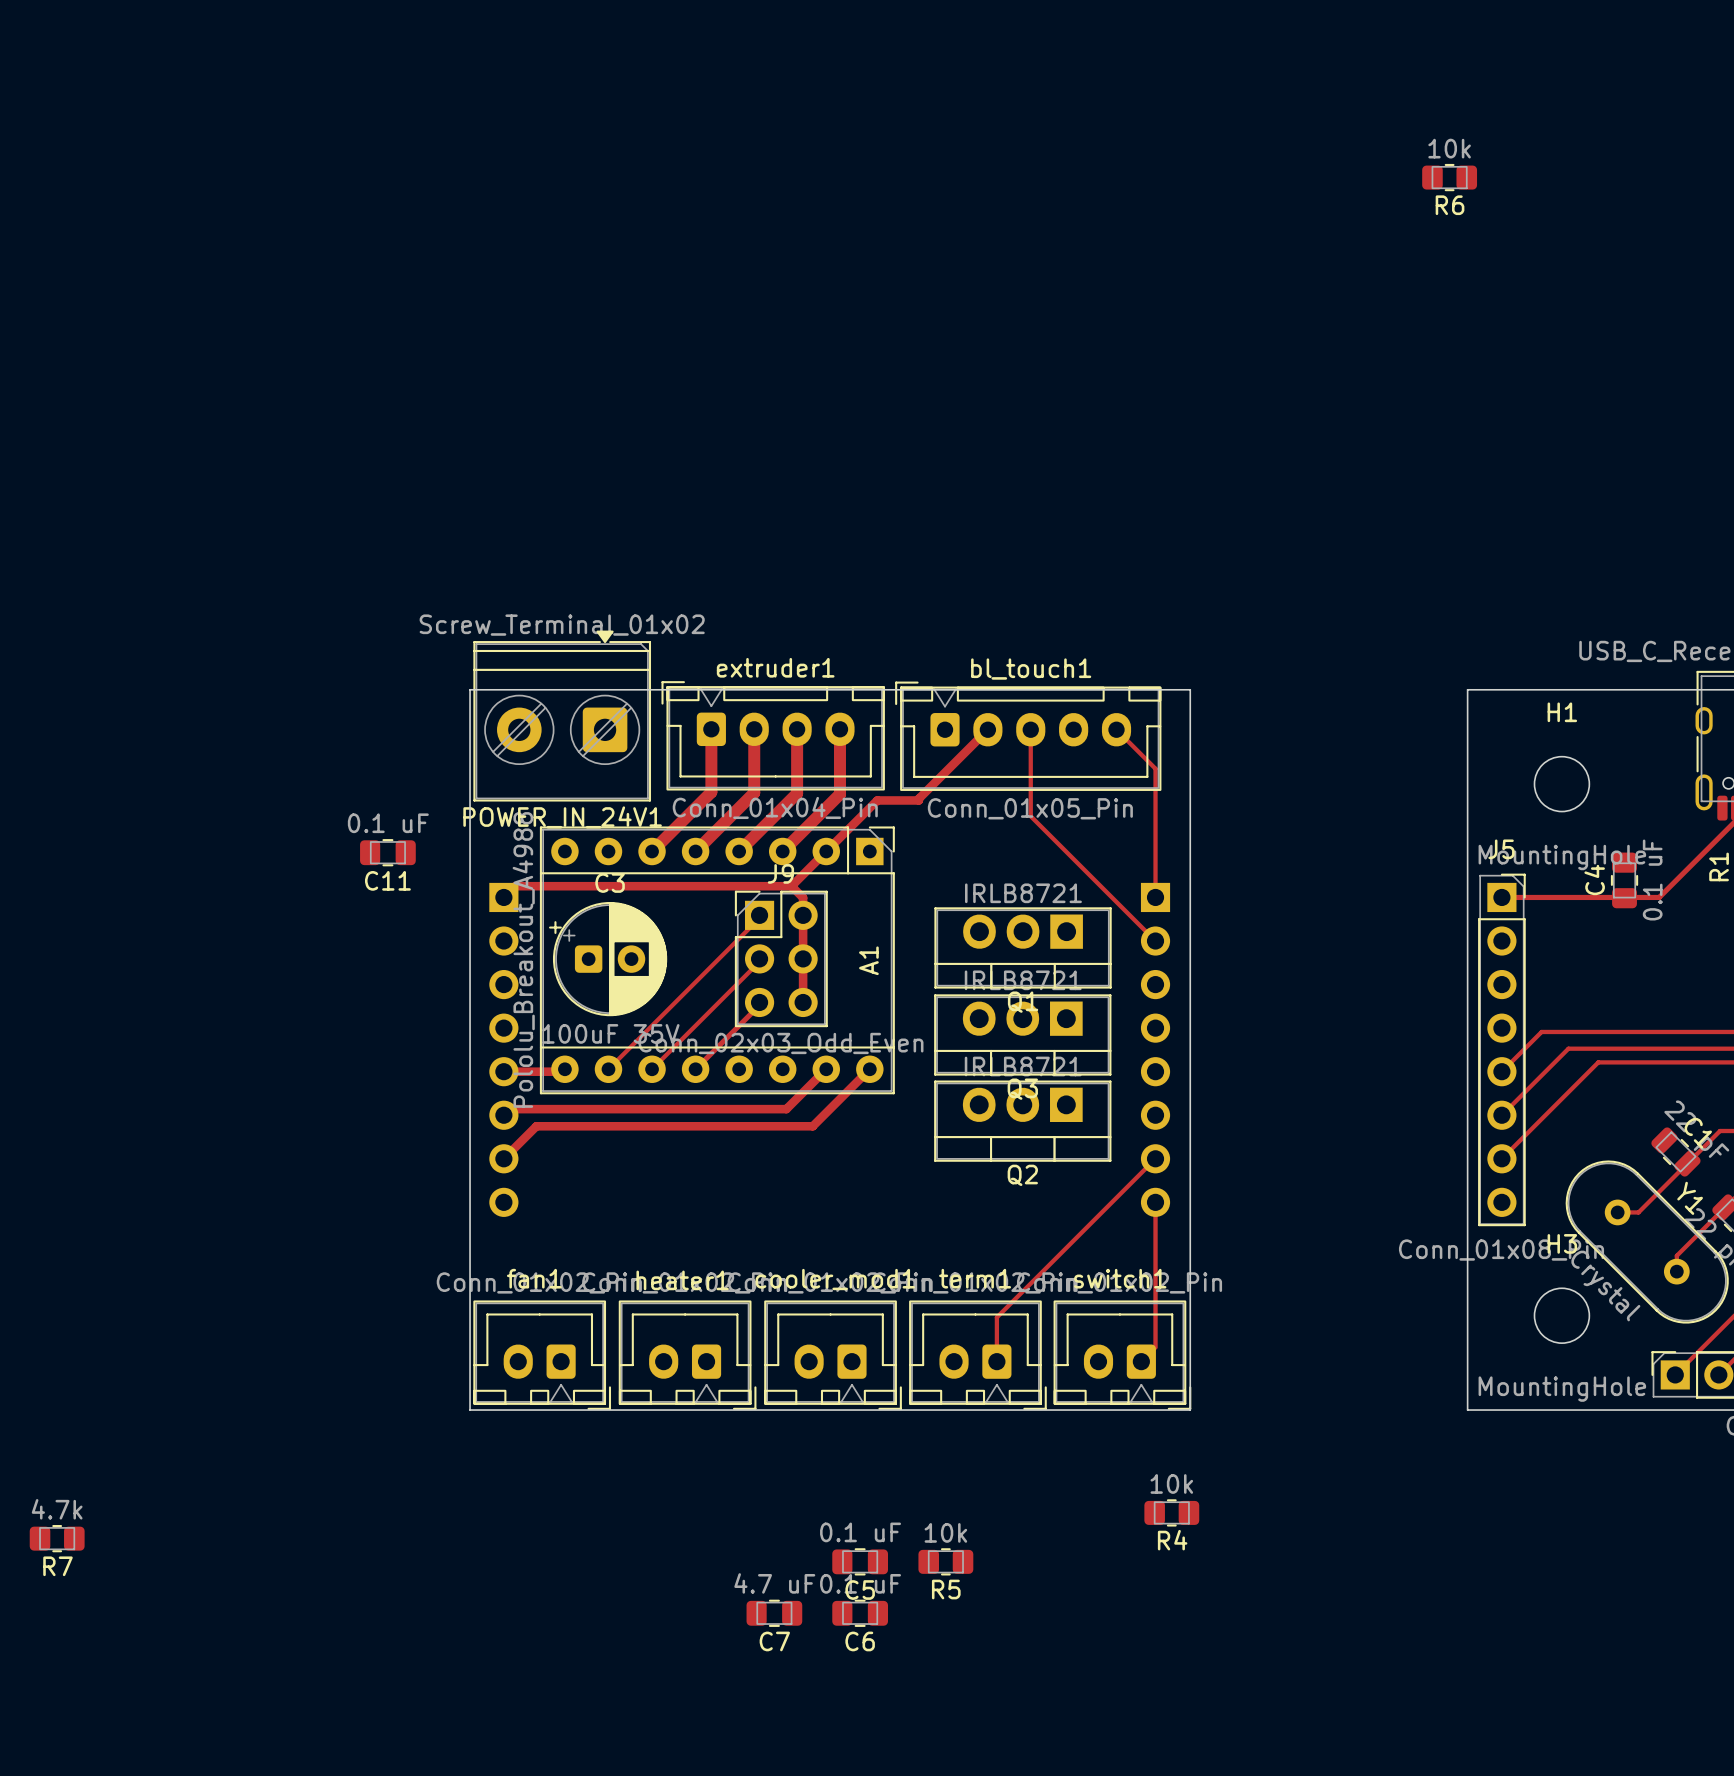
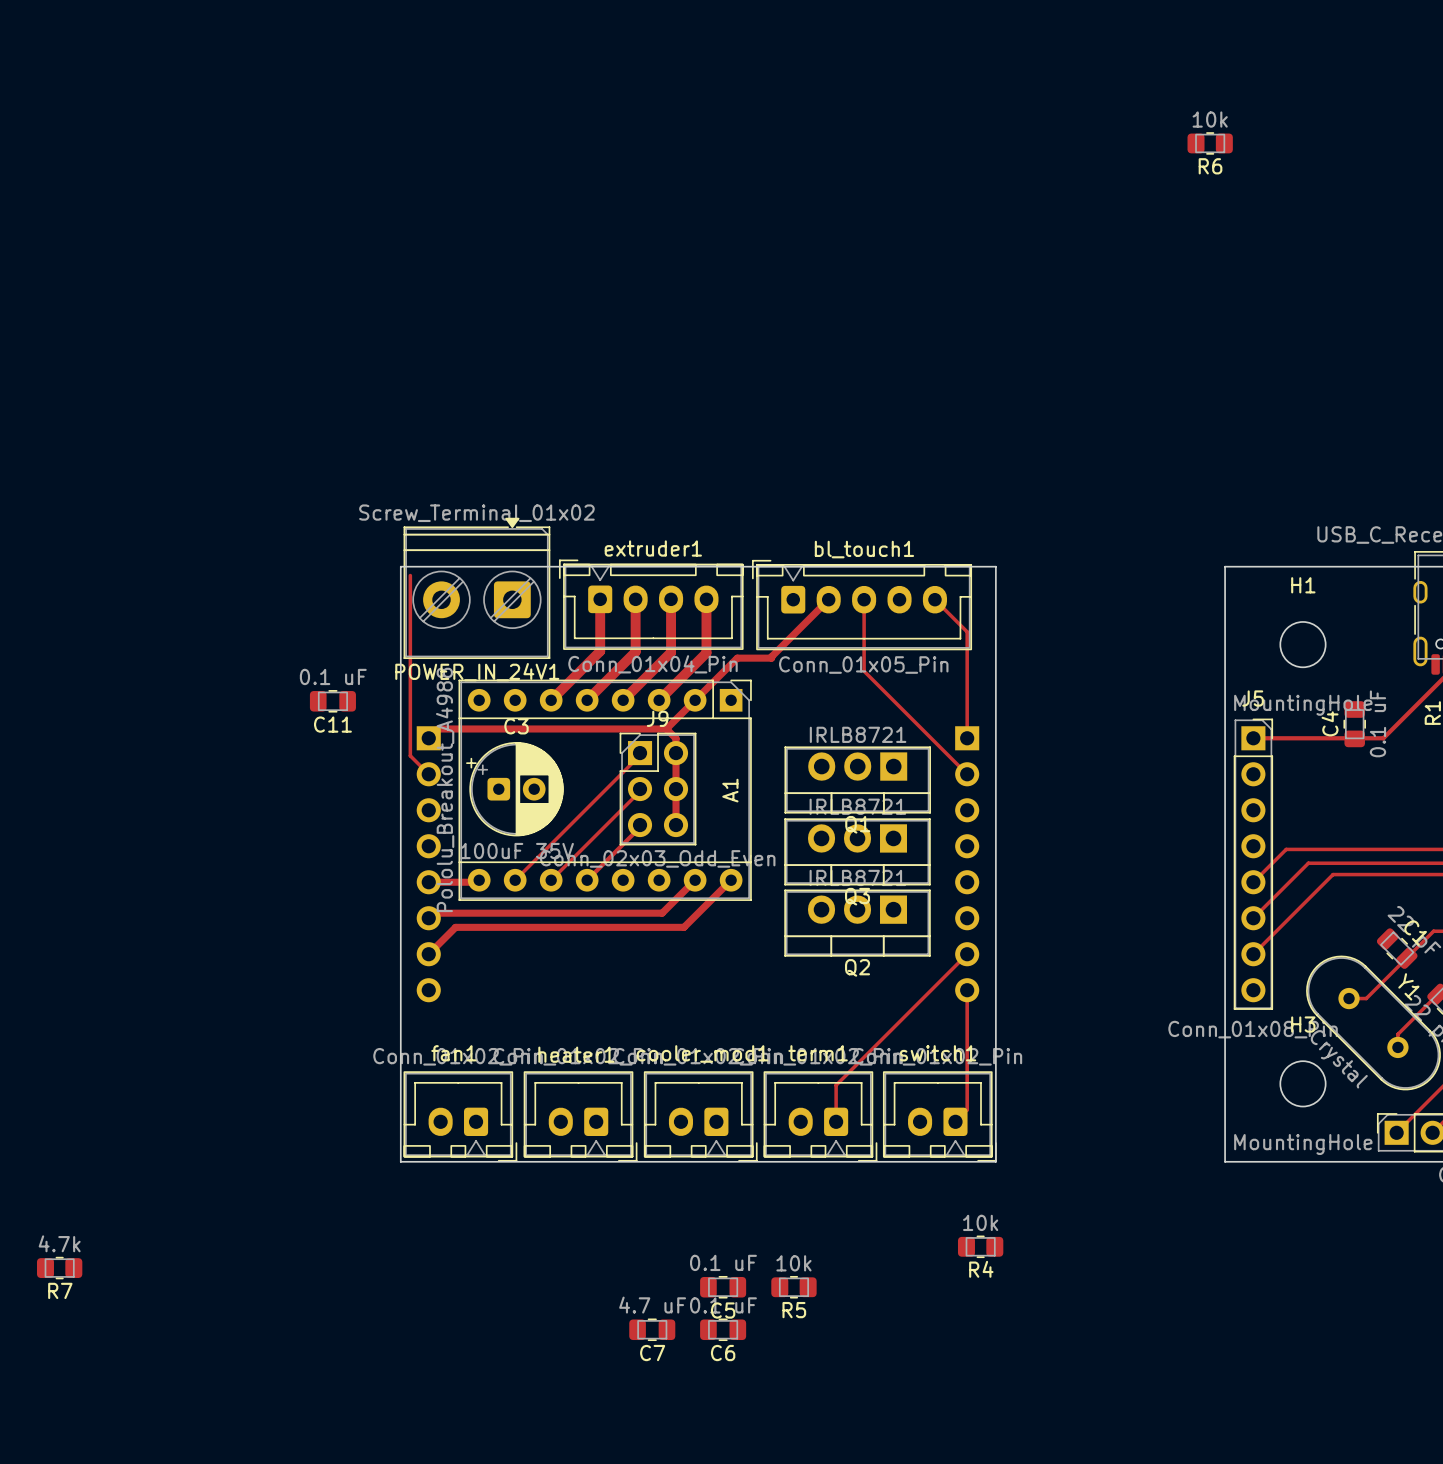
top track: none -> (410, 575) (410, 755) (428, 774)

